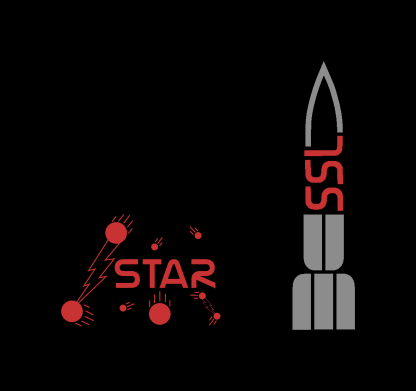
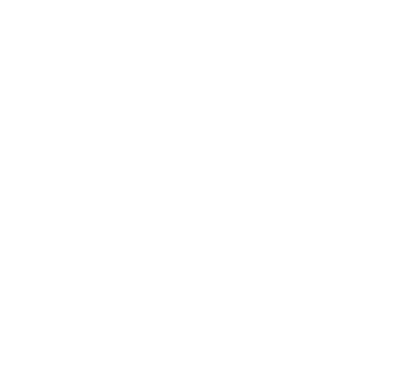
part: (323, 195) -> none
part: (140, 270) -> none

